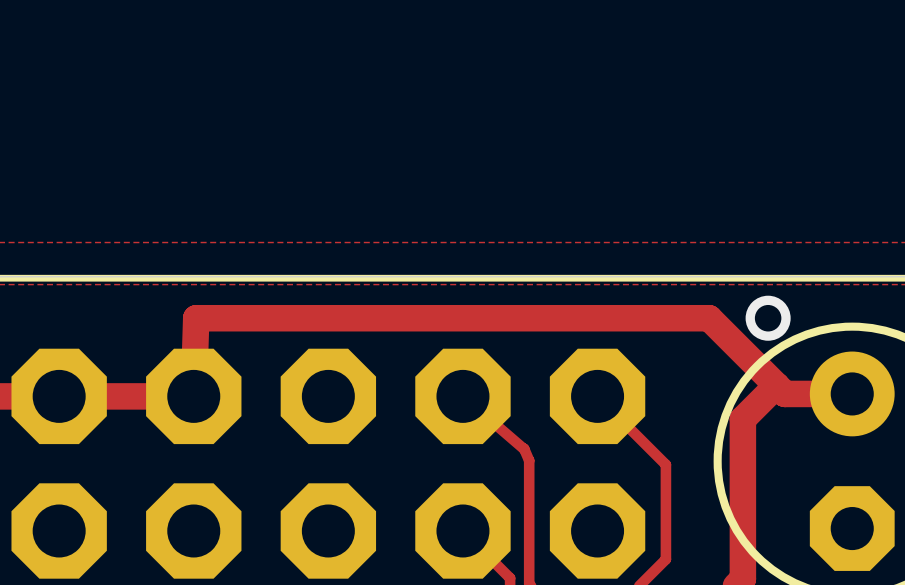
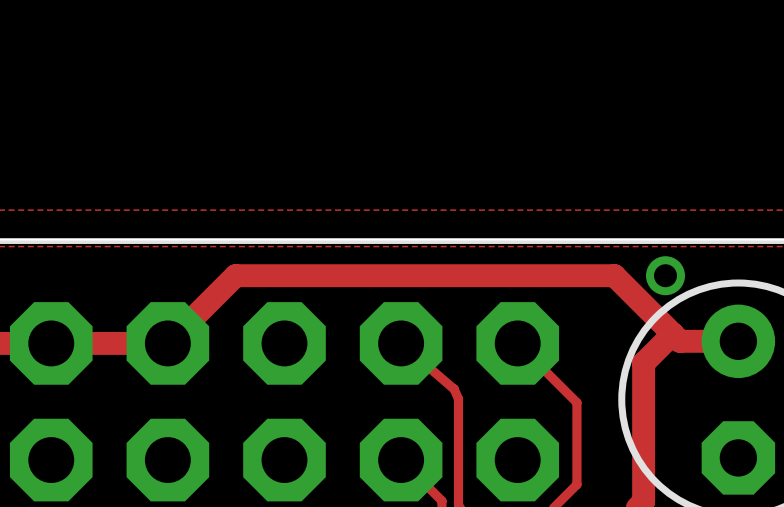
track: (271, 318) (196, 318) (193, 396) -> (235, 275) (167, 343)

